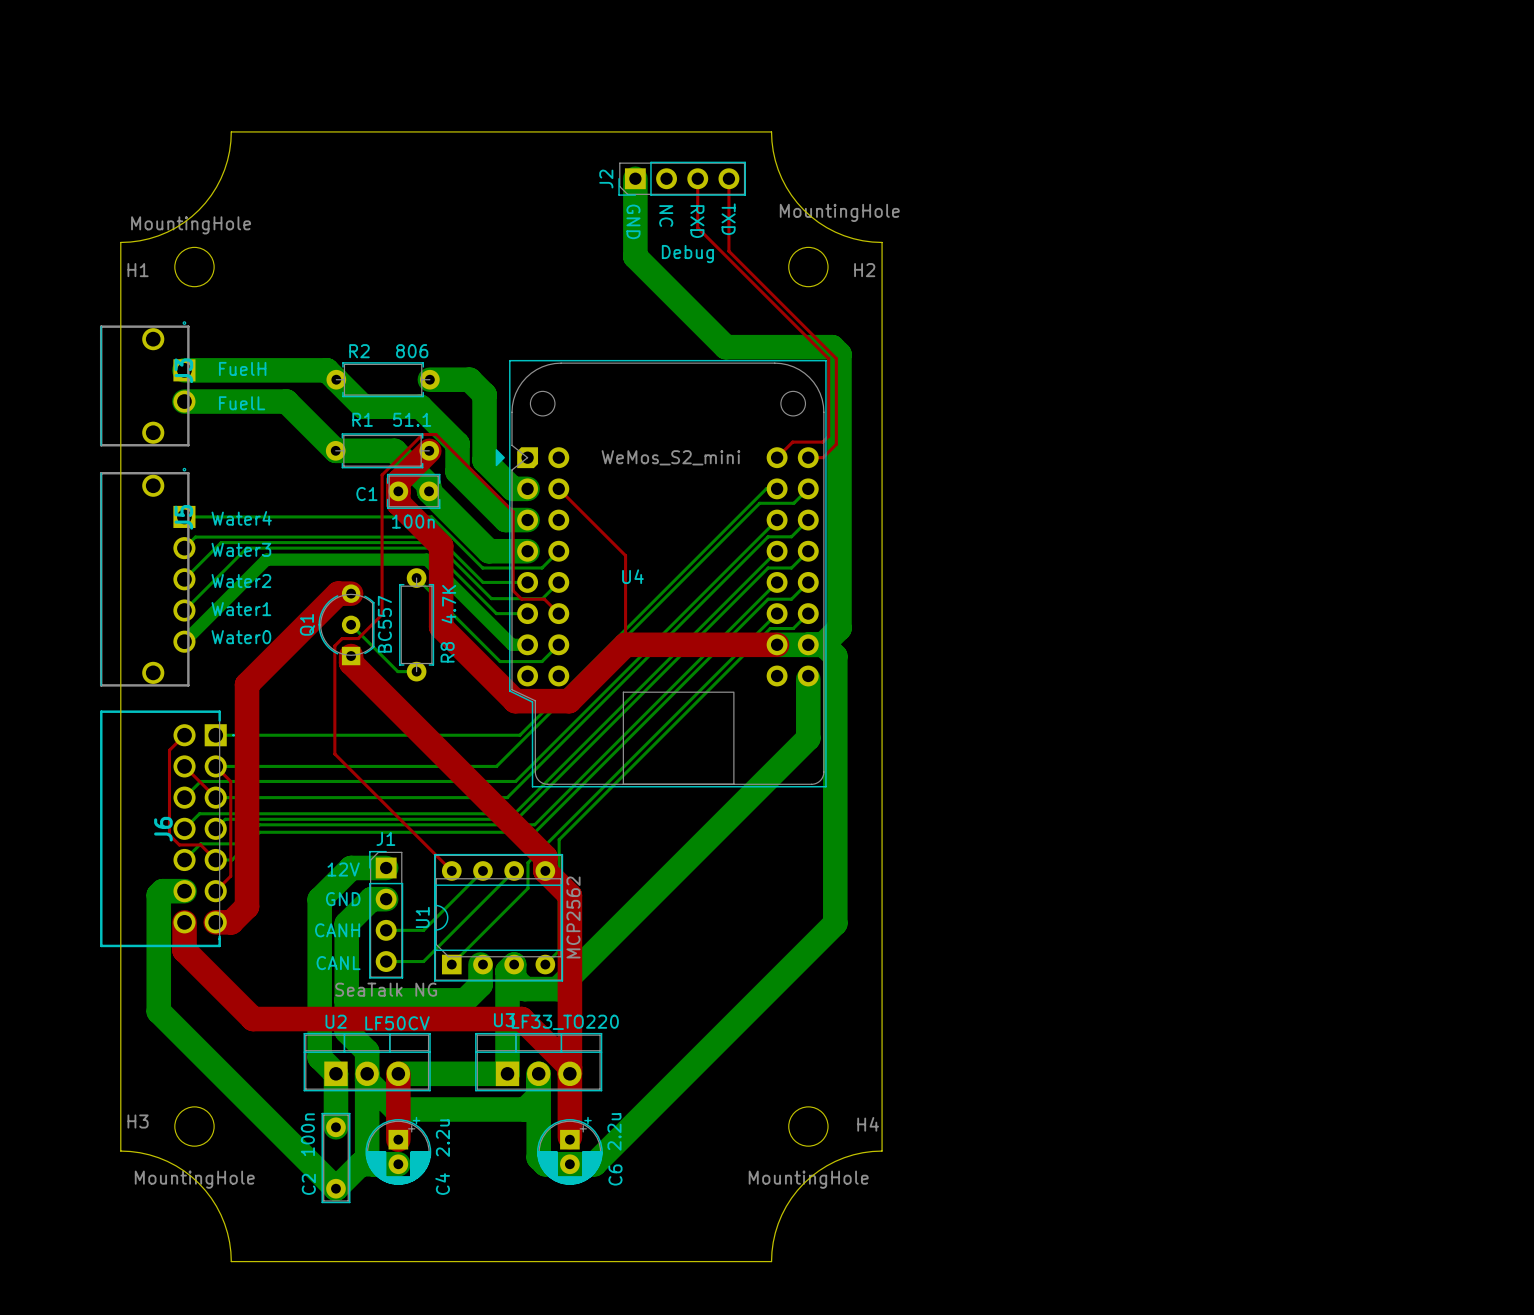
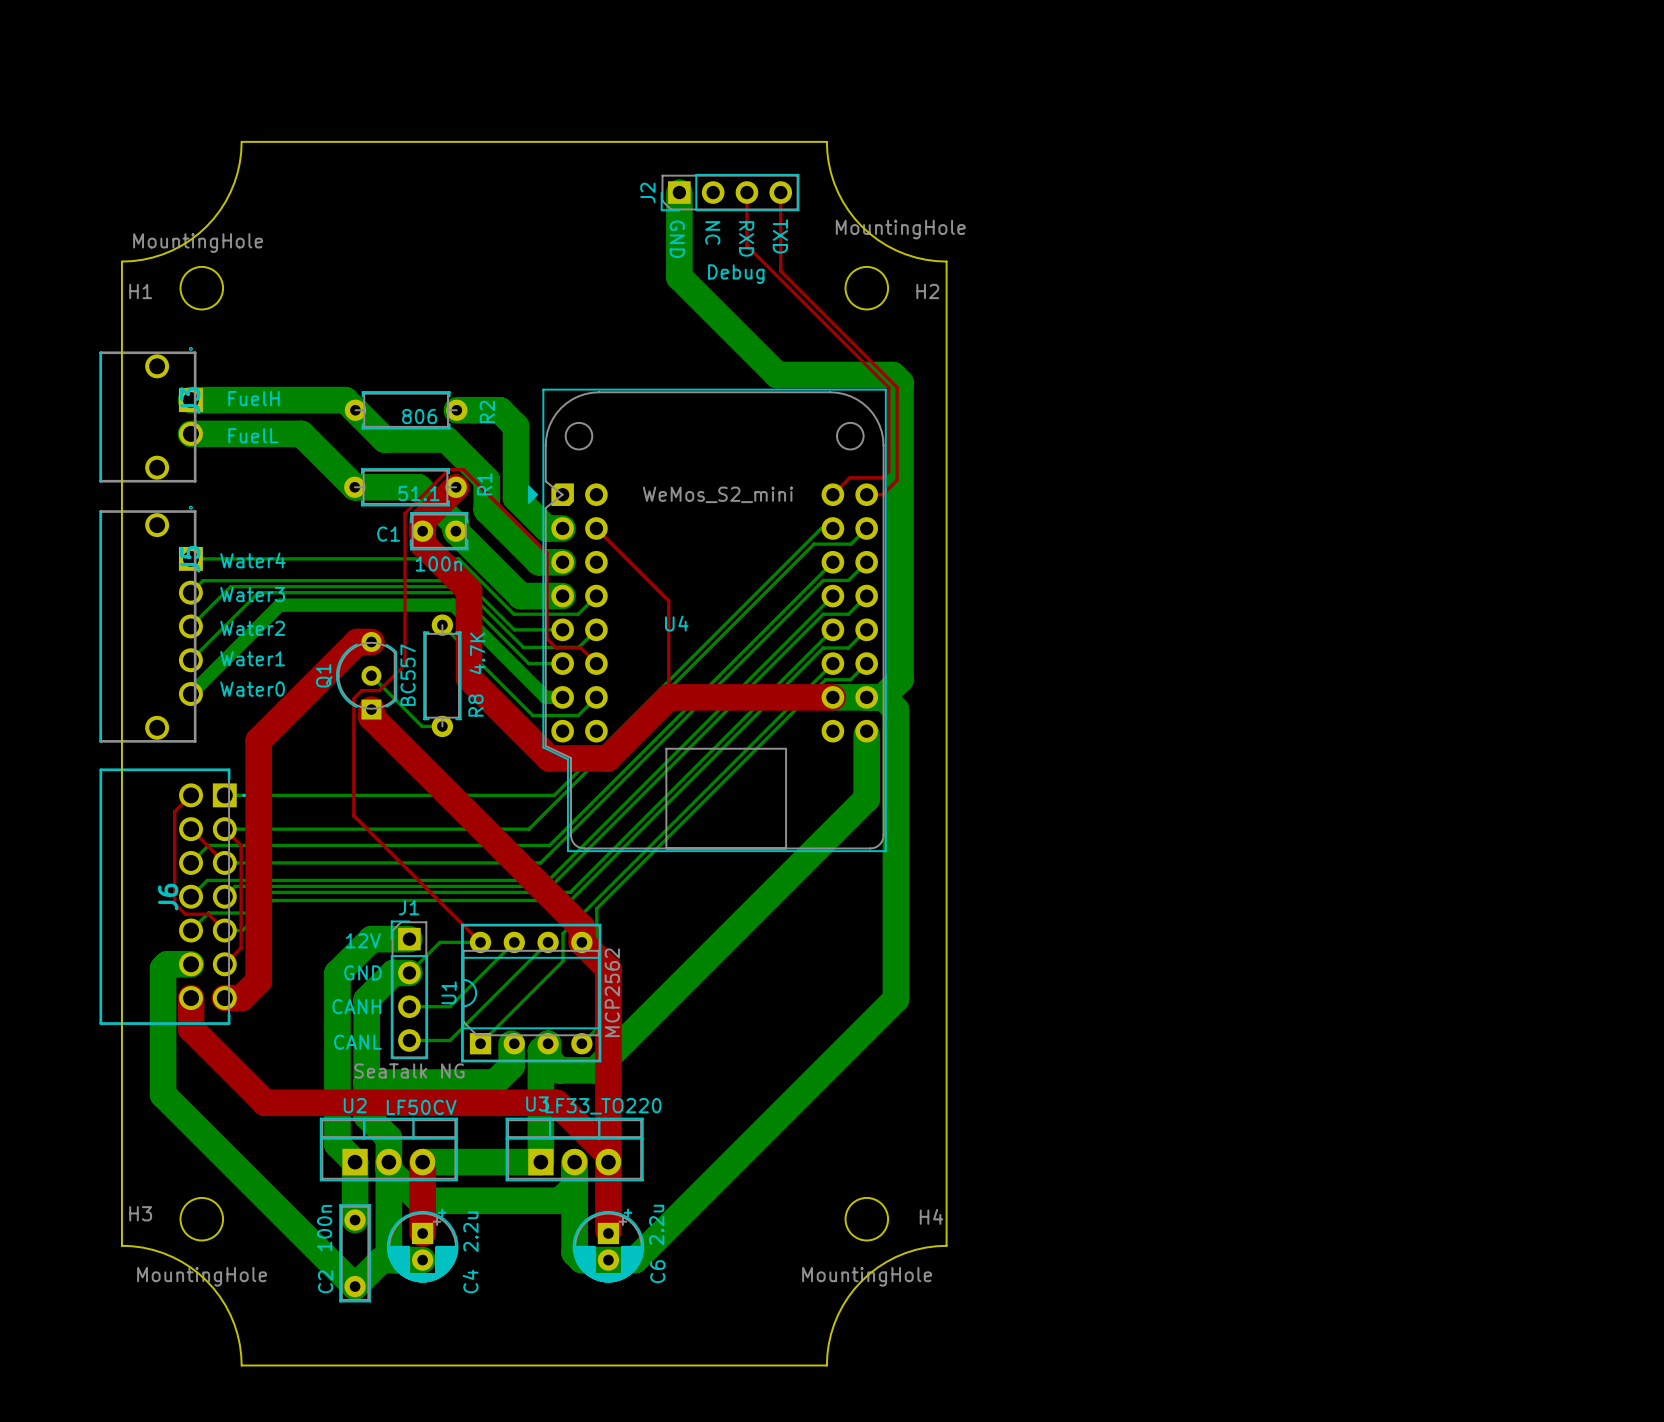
R2 name rotation: 0° (359, 351) -> 90° counterclockwise (487, 411)
R2 name position: R2 (359, 351) -> R2 (487, 411)
R2 value position: 806 (412, 351) -> 806 (419, 416)
R1 name rotation: 0° (362, 419) -> 90° counterclockwise (484, 484)
R1 name position: R1 (362, 419) -> R1 (484, 484)
R1 value position: 51.1 (412, 419) -> 51.1 (418, 493)
bottom track: none -> (480, 942) (439, 942) (409, 972)

